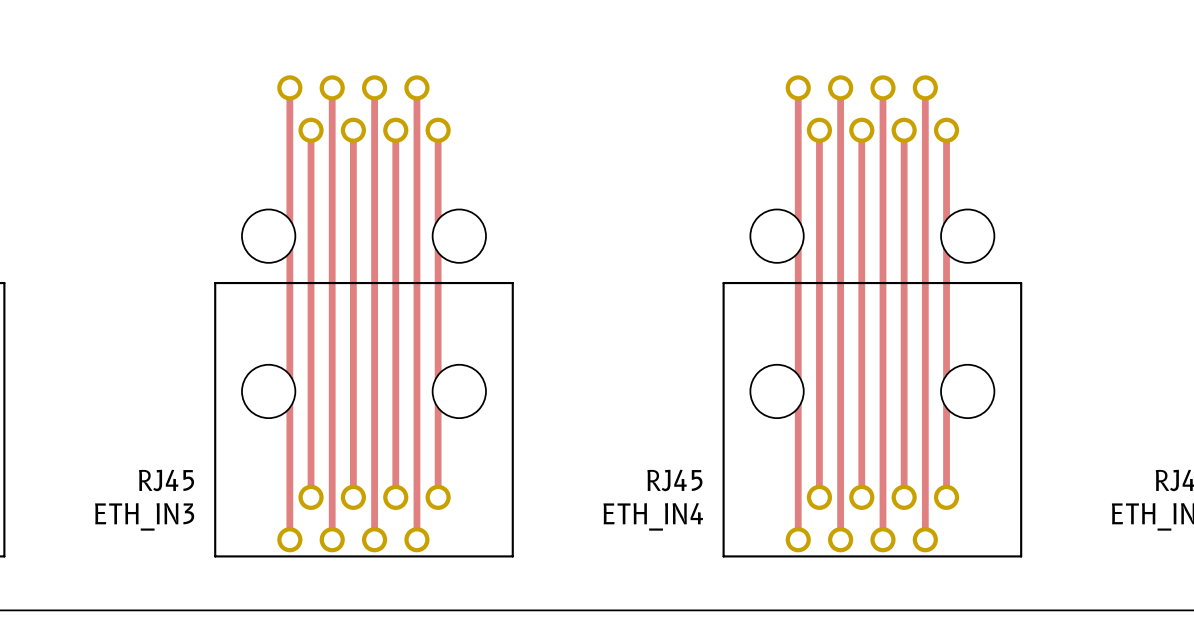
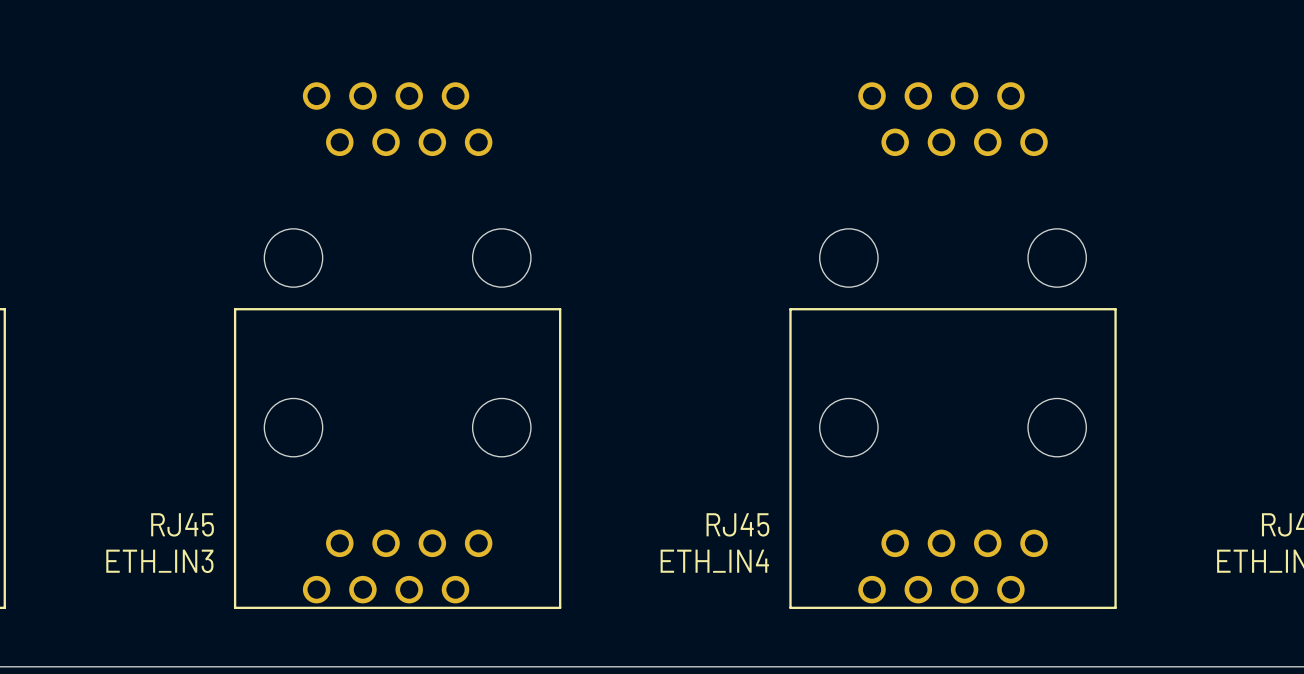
track: (289, 87) (289, 539) -> none
track: (332, 87) (332, 539) -> none
track: (374, 87) (374, 539) -> none
track: (416, 87) (416, 539) -> none
track: (798, 87) (798, 539) -> none
track: (840, 87) (840, 539) -> none
track: (882, 87) (882, 539) -> none
track: (925, 87) (925, 539) -> none
track: (311, 130) (311, 497) -> none
track: (353, 130) (353, 497) -> none
track: (395, 130) (395, 497) -> none
track: (438, 130) (438, 497) -> none
track: (819, 130) (819, 497) -> none
track: (861, 130) (861, 497) -> none
track: (904, 130) (904, 497) -> none
track: (946, 130) (946, 497) -> none

